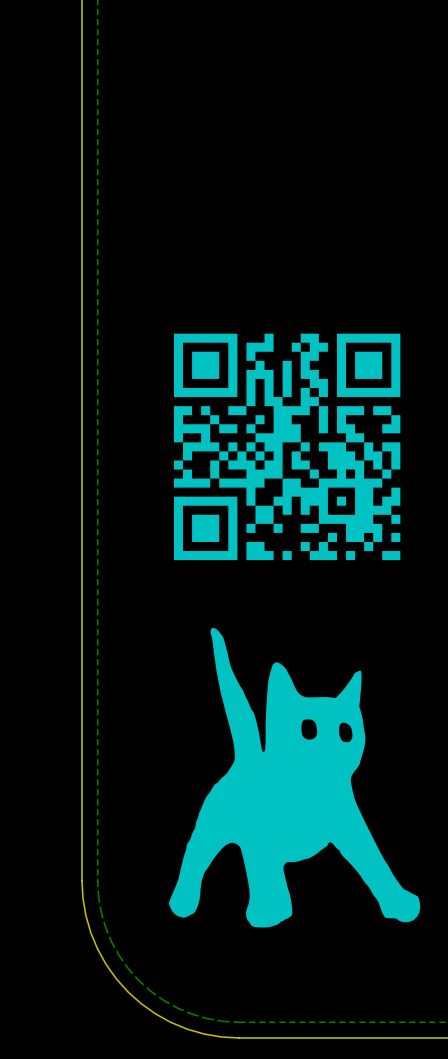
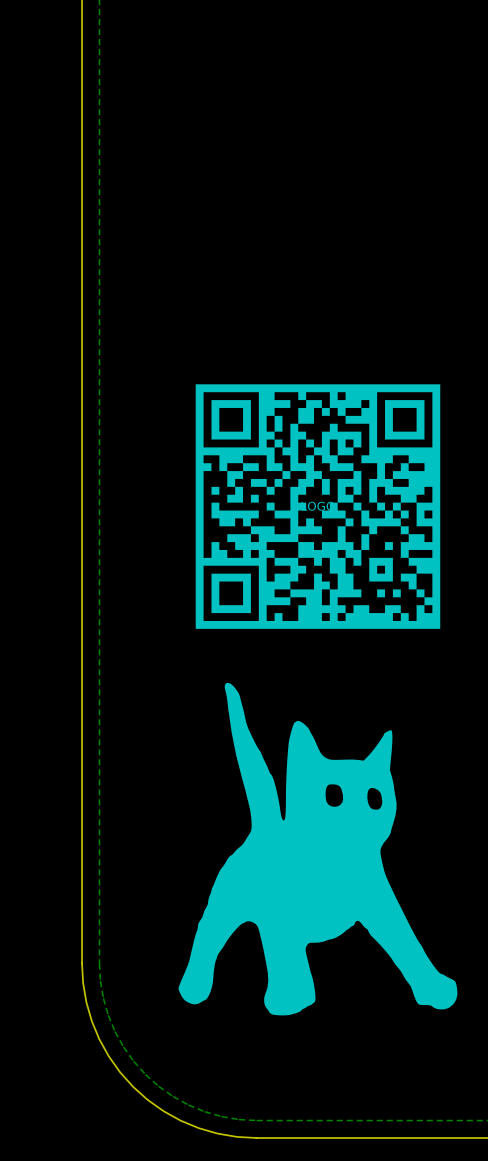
drawing shape: [173, 333, 401, 561] -> [195, 384, 441, 629]

